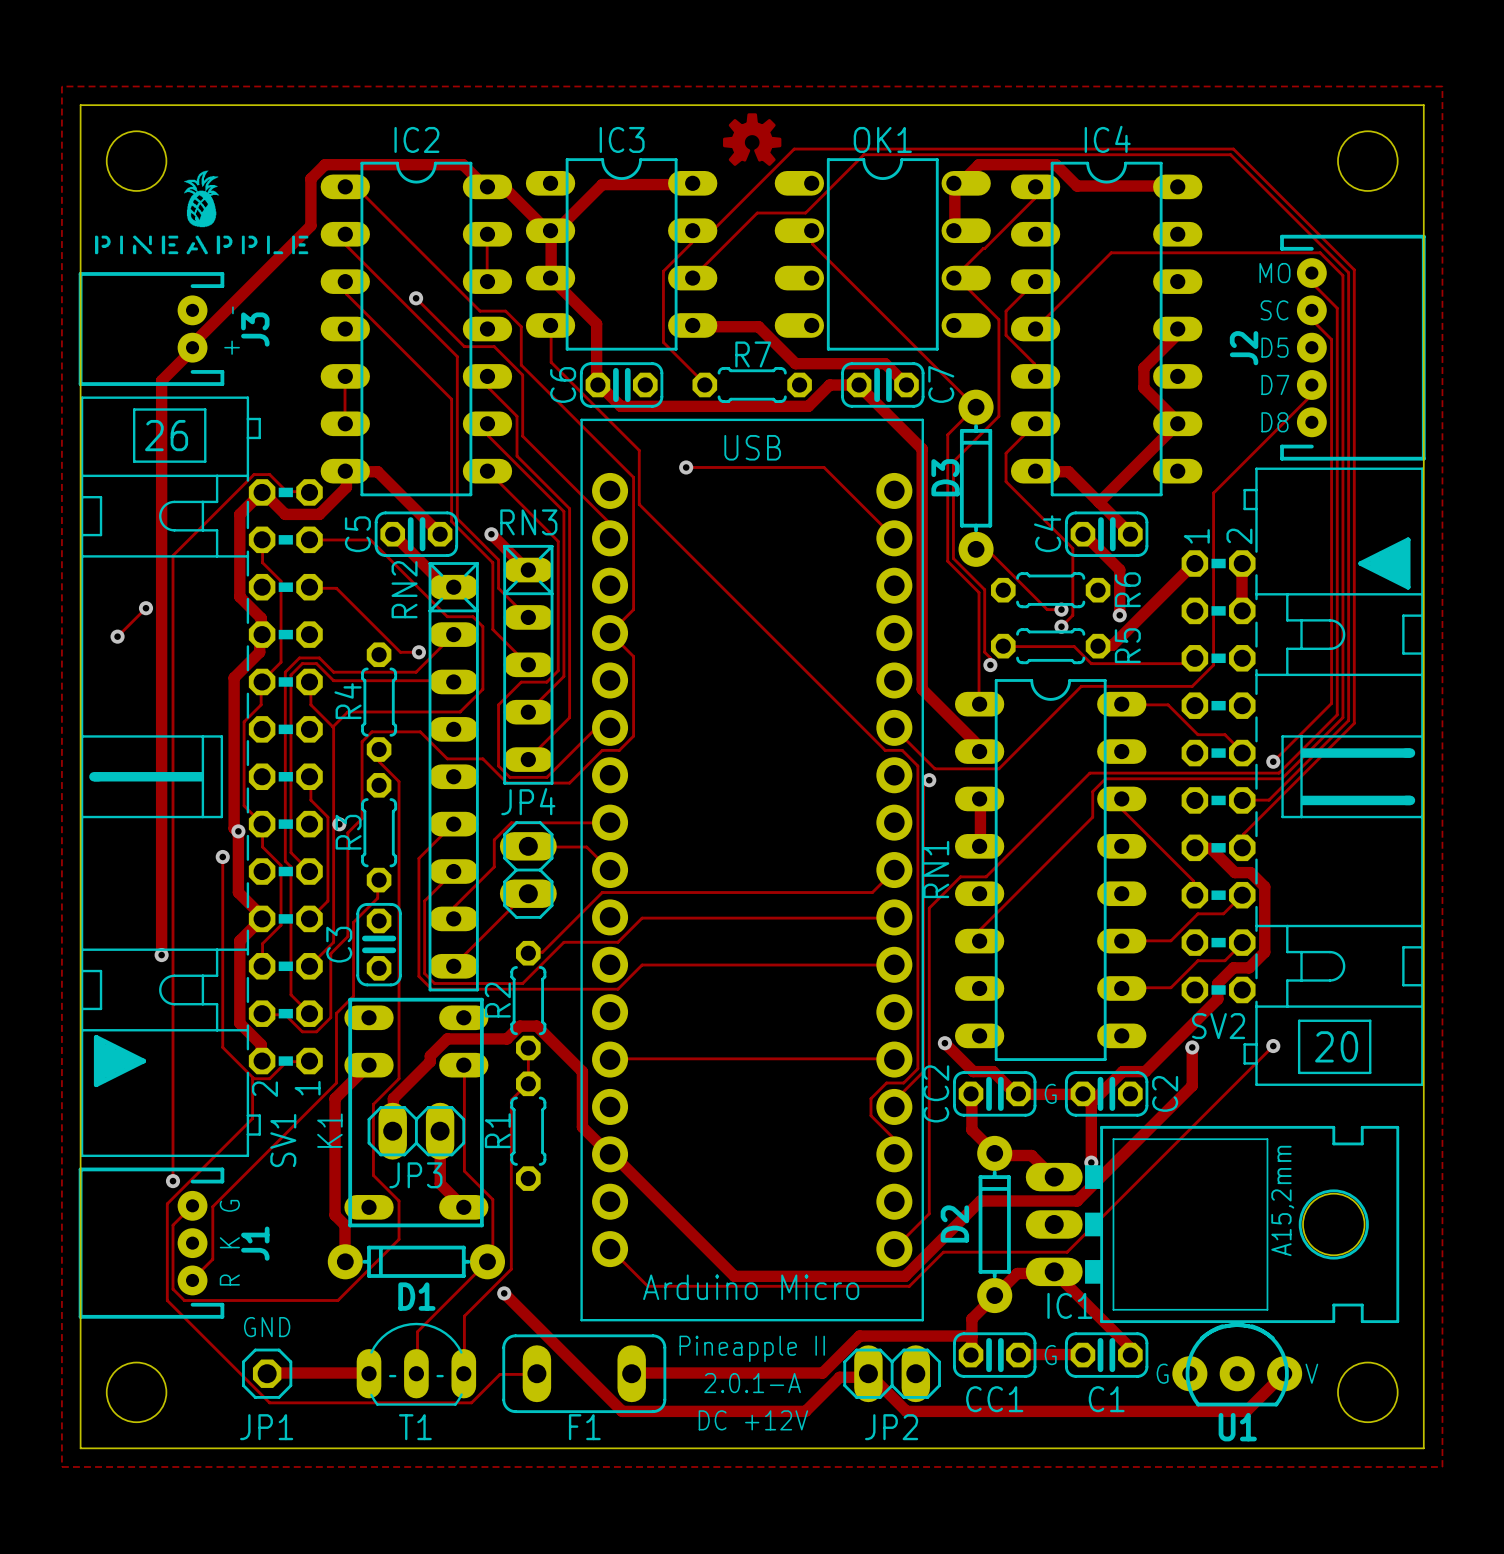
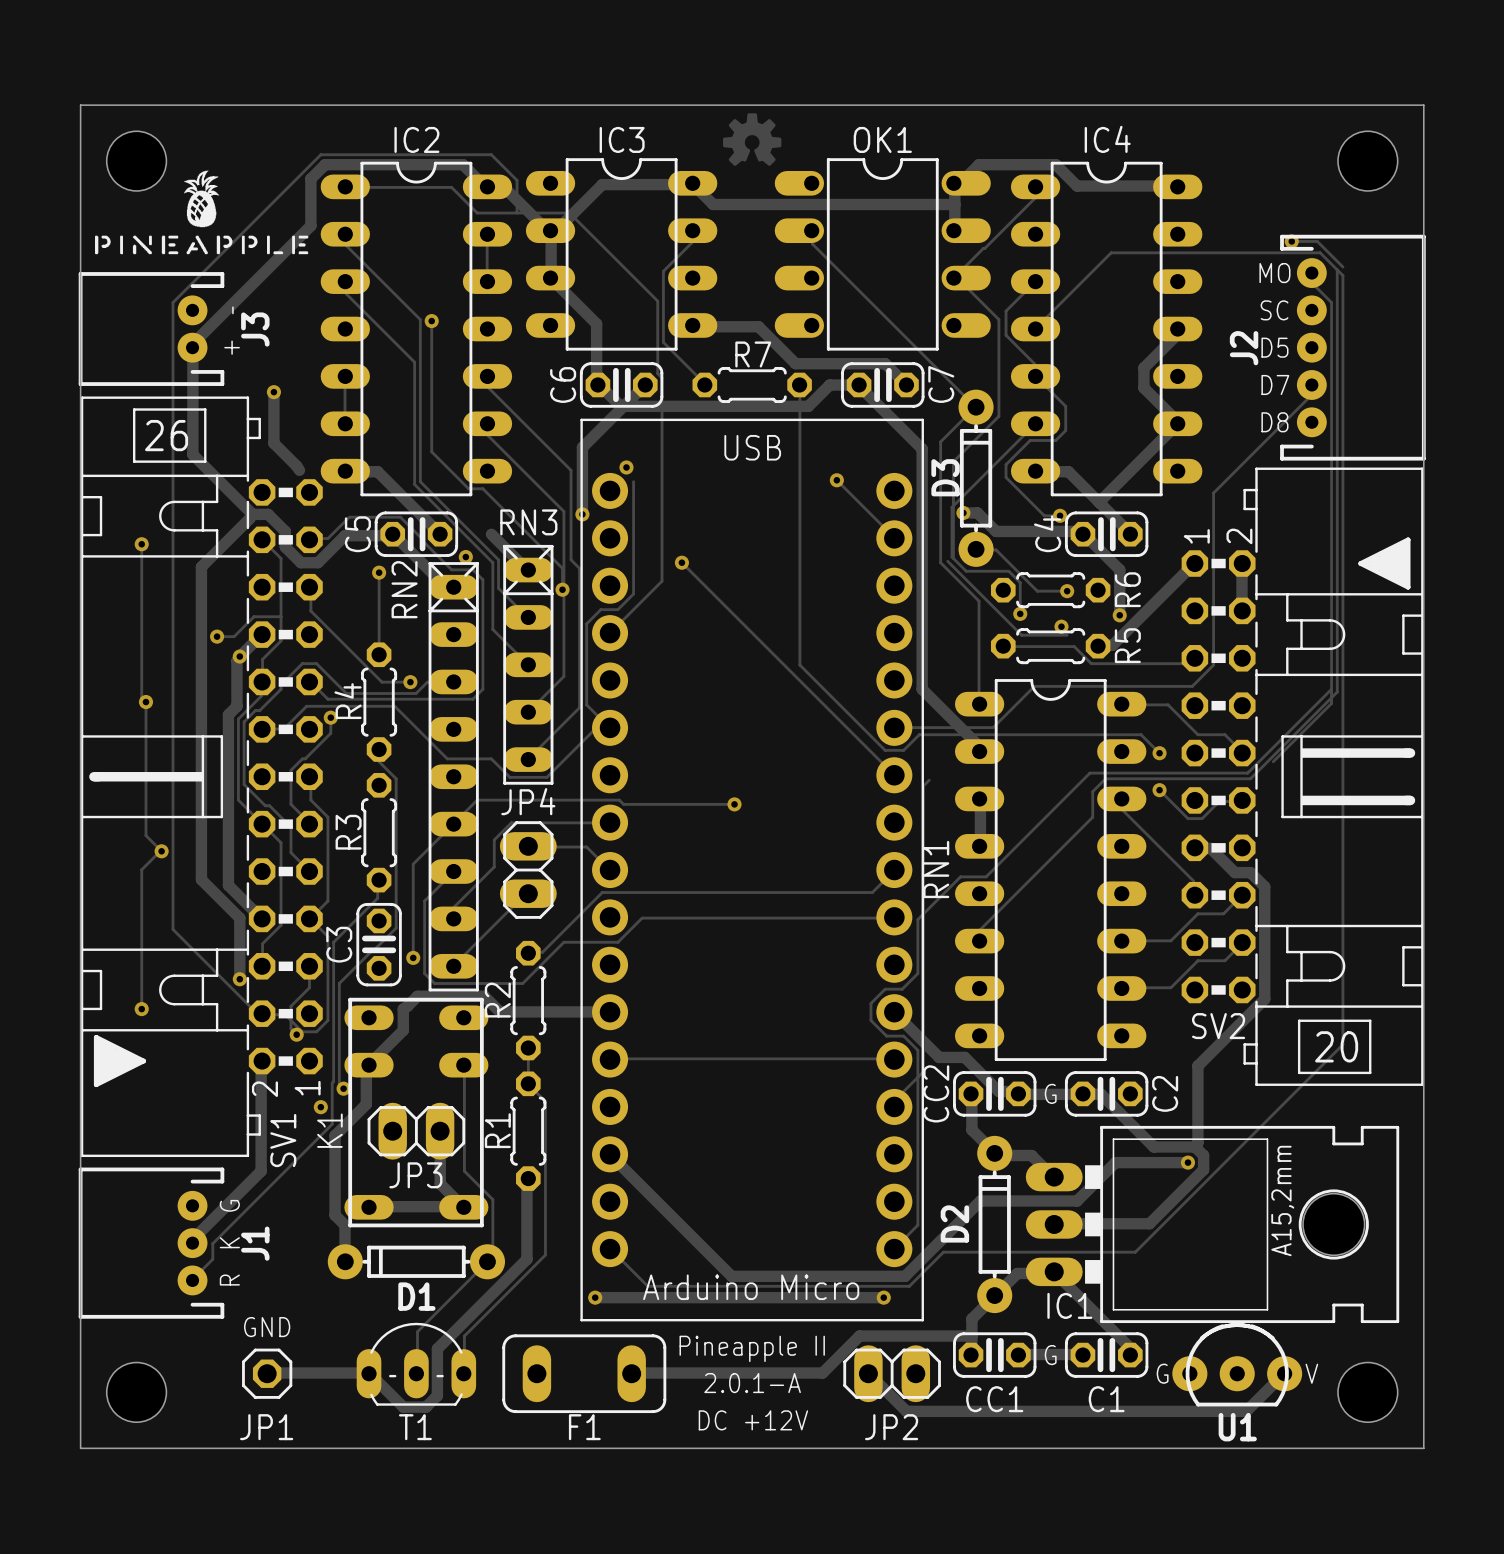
zone outline: (61, 86) (1442, 86) (1442, 1467) (61, 1467) (61, 86) -> none
track: none -> (692, 183) (713, 204) (954, 204)
track: (356, 187) (480, 311) (505, 311) (521, 326) (521, 365) (633, 477) (633, 481) -> (356, 187) (451, 187) (477, 213) (569, 213) (657, 301) (657, 373) (662, 377) (662, 581) (633, 609)
track: (692, 230) (713, 230) (794, 149) (1233, 149) (1354, 269) (1354, 723) (1243, 834) (1242, 847) -> none
via: none -> (1291, 241)
track: (1317, 241) (1230, 154) (863, 154) (805, 213) (757, 213) (692, 278) -> (1317, 241) (1291, 241)
track: (1342, 267) (1348, 272) (1348, 720) (1269, 800) (1242, 800) -> (1159, 790) (1187, 818) (1202, 818) (1219, 801) (1242, 800)
track: (416, 298) (464, 346) (494, 346) (522, 375) (522, 436) (609, 522) (610, 538) -> none
via position: (416, 298) -> (431, 321)
track: (1331, 302) (1337, 308) -> (1337, 269) (1337, 308)
track: (1311, 310) (1313, 321) (1331, 339) -> (1331, 302) (1331, 339)
track: (420, 319) (457, 356) (457, 518) -> (420, 319) (420, 481) (457, 518)
track: none -> (431, 321) (431, 451) (468, 488) (482, 488) (562, 568) (562, 589)
track: (550, 325) (551, 362) (639, 450) (639, 504) (799, 665) -> (799, 385) (799, 665)
track: (194, 342) (190, 352) (161, 380) (161, 955) -> (194, 342) (192, 347) (192, 454) (252, 514)
track: (414, 362) (451, 399) (451, 521) -> (414, 362) (414, 484) (451, 521)
track: none -> (644, 385) (582, 447) (582, 514)
track: none -> (273, 392) (273, 443) (299, 470)
via: none -> (273, 392)
track: (517, 416) (517, 456) (569, 508) (569, 717) -> (517, 416) (571, 470) (571, 559) (579, 568) (579, 707) (569, 717)
track: (947, 434) (947, 561) -> (947, 434) (940, 441) (940, 562) (979, 601)
track: (1006, 453) (1006, 464) -> (1035, 376) (1065, 406) (1065, 430) (1055, 440) (1030, 440) (1006, 464)
track: none -> (1006, 453) (952, 507) (953, 558)
via: none -> (626, 467)
track: (686, 467) (824, 467) (836, 480) -> none
via: (686, 467) -> none
track: (345, 471) (346, 487) (319, 514) (285, 514) (262, 492) (239, 514) (239, 596) (261, 618) (262, 634) (259, 639) (259, 652) (234, 677) (234, 828) (238, 831) (238, 892) (259, 913) (262, 918) (239, 940) -> (252, 514) (201, 566) (201, 879) (239, 918) (239, 940)
track: (487, 471) (558, 541) (558, 670) (546, 682) (521, 682) (498, 704) (498, 766) -> none
track: (1006, 477) (1006, 481) (1072, 548) (1072, 615) (1061, 626) -> (1006, 477) (1044, 515) (1060, 515)
via: none -> (836, 480)
track: (309, 492) (286, 491) (269, 474) (254, 474) (173, 555) -> (517, 213) (517, 180) (491, 154) (320, 154) (173, 302) (173, 555)
track: none -> (963, 512) (977, 512) (996, 531) (1078, 531) (1082, 534)
via: none -> (963, 512)
track: none -> (252, 514) (268, 514) (285, 531) (285, 547) (300, 562) (318, 562) (345, 535) (392, 534)
via: none -> (582, 514)
via: none -> (1060, 515)
via position: (491, 534) -> (465, 557)
track: (262, 539) (262, 562) (281, 581) -> (262, 539) (281, 558) (281, 581)
track: (309, 539) (370, 539) (447, 616) (472, 616) (482, 626) -> (309, 539) (327, 538) (349, 517) (400, 517) (451, 569) (472, 569) (482, 579) (482, 626)
track: none -> (141, 544) (141, 697) (145, 702) (145, 835) (161, 851) (141, 869) (141, 1009)
via: none -> (141, 544)
track: (987, 549) (1008, 571) -> (966, 571) (1008, 571)
track: none -> (987, 549) (996, 549) (1037, 591) (1067, 591)
track: none -> (681, 562) (894, 775)
via: none -> (681, 562)
track: (966, 571) (984, 589) (984, 652) (990, 657) (990, 665) -> none
track: none -> (379, 572) (379, 654)
via: none -> (379, 572)
track: (1020, 582) (1047, 609) (1061, 609) -> (1020, 582) (1020, 613)
track: (310, 588) (336, 588) (400, 652) (418, 652) -> (310, 588) (310, 611) (381, 682) (410, 682)
via: none -> (562, 589)
track: (979, 592) (979, 601) -> (979, 592) (1021, 635) (1067, 635)
track: (633, 593) (633, 609) -> (633, 593) (617, 609) (600, 609) (586, 623) (586, 704) (610, 727) (602, 721) (595, 729)
track: (145, 608) (117, 636) -> none
via: (145, 608) -> none
via position: (1061, 609) -> (1067, 591)
via: none -> (1020, 613)
track: none -> (281, 616) (254, 616) (234, 636) (217, 636)
track: (610, 633) (633, 656) (633, 736) (619, 750) (602, 750) (569, 783) (507, 783) (482, 758) -> (498, 766) (491, 758) (482, 758)
track: none -> (262, 634) (236, 660) (236, 706) (228, 714) (228, 885) (262, 918)
track: (453, 634) (416, 672) (333, 672) (319, 657) (299, 657) (285, 672) (285, 861) (290, 866) (290, 994) (309, 1013) -> none
via: (117, 636) -> none
via: none -> (217, 636)
track: (281, 640) (281, 662) (262, 680) -> (281, 640) (262, 659) (262, 680)
via position: (418, 652) -> (410, 682)
via: none -> (239, 656)
via: (990, 665) -> none
track: (290, 675) (290, 770) -> (330, 717) (330, 733) (290, 770)
track: (333, 680) (453, 681) -> (333, 680) (346, 693) (416, 693) (427, 682) (453, 681)
track: (310, 682) (310, 704) (333, 727) (333, 942) (309, 966) -> (296, 1034) (290, 1028) (290, 1006) (309, 987) (309, 966)
track: (1081, 686) (998, 768) (934, 768) (894, 727) -> (1081, 686) (1034, 686) (993, 727) (894, 727)
track: (1337, 692) (1337, 714) (1278, 773) (1247, 773) -> (1331, 689) (1247, 773)
track: (261, 696) (261, 704) (255, 710) -> (290, 675) (281, 684) (281, 689) (259, 710) (255, 710)
track: none -> (261, 696) (238, 719) (238, 800) (244, 805)
track: (472, 699) (460, 711) (347, 711) (332, 726) -> (472, 699) (327, 699) (310, 682)
via: none -> (145, 702)
via: none -> (330, 717)
track: (1342, 717) (1281, 778) (1250, 778) -> (1337, 692) (1250, 778)
track: none -> (262, 729) (283, 729) (306, 706) (394, 706) (420, 731)
track: (420, 731) (372, 731) (362, 741) (362, 818) (347, 832) (347, 936) (330, 953) (330, 1017) (327, 1020) -> (309, 918) (327, 936) (327, 1020)
track: (902, 750) (917, 766) (917, 919) -> (929, 908) (917, 919)
track: none -> (902, 750) (919, 734) (1141, 734) (1159, 753)
via: none -> (1159, 753)
via: (1273, 761) -> none
track: (396, 778) (399, 781) (399, 1078) (373, 1104) (373, 1175) (399, 1201) (399, 1239) (337, 1300) (184, 1300) (173, 1289) (173, 1225) (192, 1205) -> (396, 778) (396, 928) (339, 983) (339, 1084) (343, 1088)
via: (929, 780) -> none
track: (244, 784) (244, 805) -> (244, 784) (290, 827)
via: none -> (1159, 790)
track: (290, 804) (290, 827) -> (290, 804) (309, 824)
track: none -> (734, 804) (623, 804) (619, 800) (477, 800) (453, 824)
via: none -> (734, 804)
track: (262, 824) (262, 847) (281, 865) -> (262, 824) (281, 842) (281, 865)
via: (339, 824) -> none
via: (238, 831) -> none
via: none -> (161, 851)
track: (222, 856) (222, 1047) (254, 1078) (269, 1078) (286, 1061) (309, 1061) -> none
via: (222, 856) -> none
track: (418, 858) (418, 976) (431, 989) (617, 989) (642, 965) (894, 964) -> (418, 858) (413, 864) (413, 957)
track: (929, 908) (929, 1213) (917, 1225) -> none
track: (353, 922) (353, 996) (336, 1013) (336, 1083) (212, 1206) (212, 1243) -> (353, 922) (333, 942) (332, 1124) (212, 1243)
track: (173, 929) (173, 1181) -> (173, 929) (256, 1013) (262, 1013)
track: (1264, 952) (1249, 967) (1233, 967) (1217, 983) (1217, 999) (1145, 1071) (1122, 1071) (1094, 1100) (1082, 1093) (1091, 1104) (1091, 1162) -> (1264, 952) (1264, 999) (1197, 1065) (1197, 1142) (1195, 1146)
via: (161, 955) -> none
via: none -> (413, 957)
track: (917, 973) (917, 1050) -> (917, 973) (902, 989) (885, 989) (870, 1003) (870, 1020) (886, 1036) (903, 1036) (917, 1050)
track: (239, 979) (239, 1023) (261, 1044) (262, 1061) -> (192, 1243) (192, 1239) (261, 1171) (262, 1061)
via: none -> (239, 979)
via: none -> (141, 1009)
via: none -> (296, 1034)
track: (944, 1043) (973, 1071) (993, 1071) (1013, 1091) -> (894, 1012) (939, 1057) (964, 1057) (998, 1091) (1013, 1091)
via: (944, 1043) -> none
track: (1273, 1046) (1067, 1252) -> (1342, 717) (1342, 1044) (1135, 1252) (1067, 1252)
via: (1273, 1046) -> none
track: (1192, 1047) (1192, 1085) (1115, 1162) -> (1187, 1162) (1115, 1162)
via: (1192, 1047) -> none
track: (369, 1065) (335, 1098) (335, 1135) -> (610, 1012) (499, 1011) (484, 996) (417, 996) (403, 1009) (403, 1030) (369, 1064) (366, 1070) (366, 1104) (335, 1135)
track: (917, 1068) (903, 1083) (886, 1083) (870, 1098) (870, 1115) (893, 1138) (894, 1154) -> (917, 1068) (917, 1225)
track: (253, 1078) (252, 1118) (167, 1203) (167, 1300) (269, 1402) (471, 1402) (499, 1374) (536, 1373) -> none
track: (528, 1083) (511, 1100) (511, 1269) (464, 1316) (464, 1336) -> (528, 1083) (545, 1101) (545, 1255) (464, 1336)
via: none -> (343, 1088)
track: none -> (1082, 1093) (1101, 1094) (1153, 1146) (1195, 1146)
via: none -> (320, 1107)
track: (392, 1131) (393, 1098) (430, 1061) (430, 1056) (447, 1038) (507, 1038) (519, 1026) (536, 1026) (582, 1071) (582, 1127) (609, 1154) (615, 1156) (734, 1276) -> (610, 1154) (731, 1276) (734, 1276)
track: none -> (1195, 1146) (1203, 1155) (1203, 1169) (1149, 1223) (1054, 1224)
via: (1091, 1162) -> none
via: none -> (1187, 1162)
track: none -> (528, 1178) (526, 1259) (437, 1348) (437, 1395) (426, 1407) (403, 1407) (369, 1373)
via: (173, 1181) -> none
track: none -> (463, 1206) (369, 1207)
track: (504, 1293) (622, 1411) (805, 1411) (839, 1377) (863, 1377) (868, 1373) -> none
via position: (504, 1293) -> (595, 1297)
track: none -> (595, 1297) (883, 1297)
via: none -> (883, 1297)

